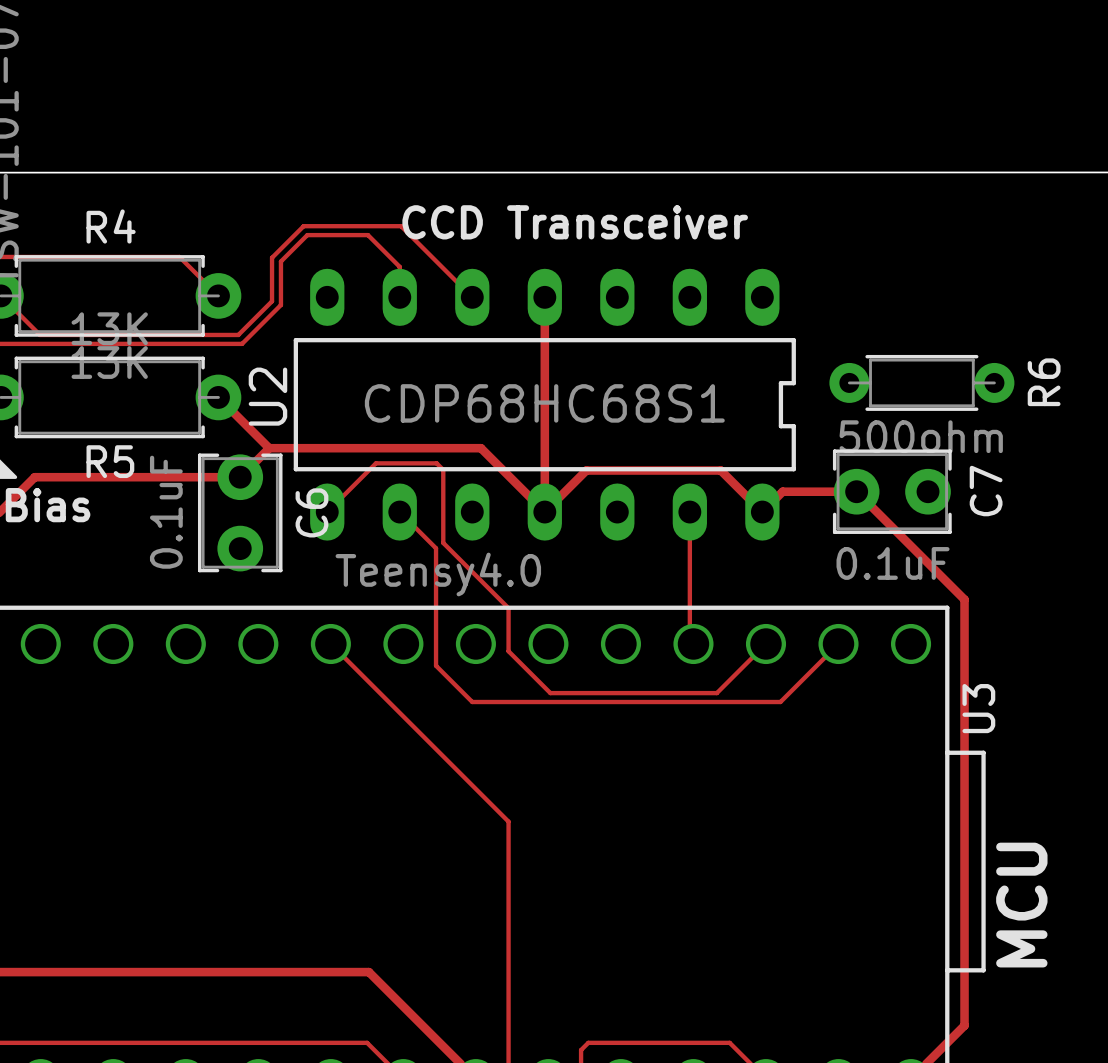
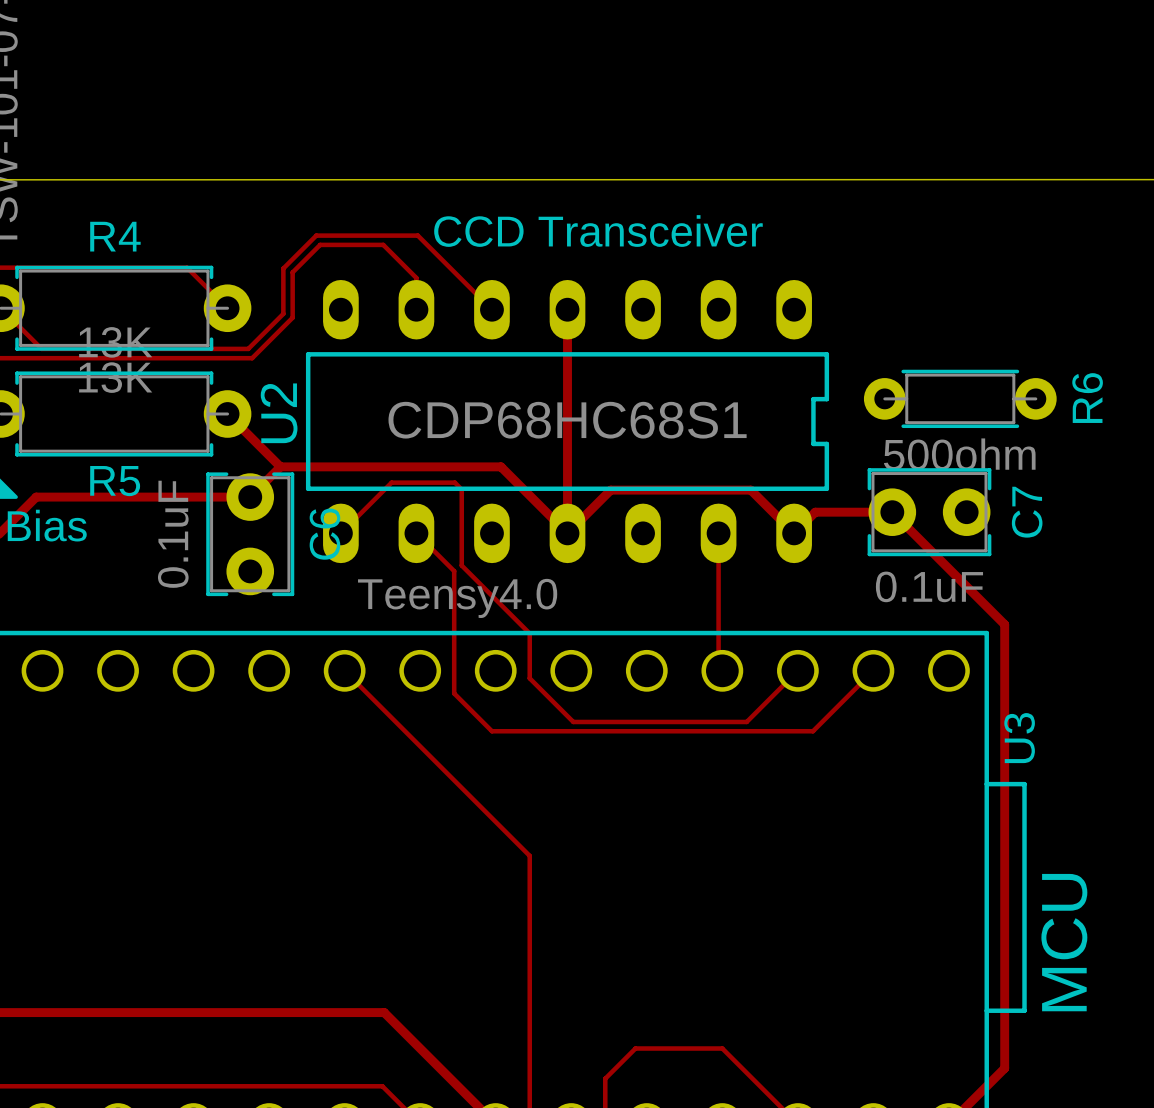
track: (729, 1042) (588, 1042) (581, 1050) -> (760, 1086) (722, 1048) (635, 1048) (605, 1078) (605, 1093)

